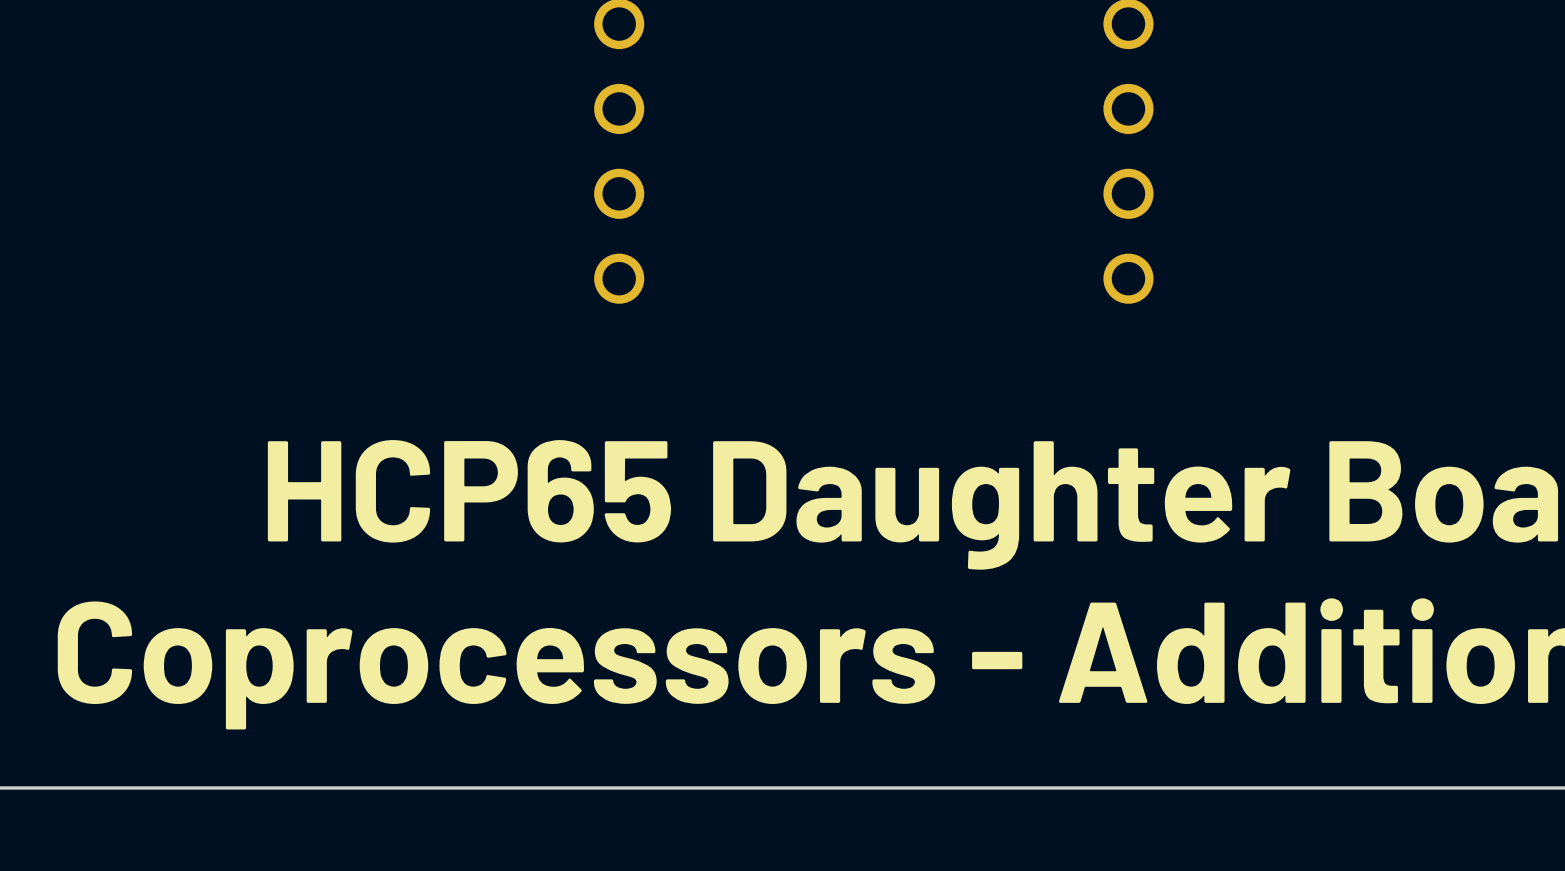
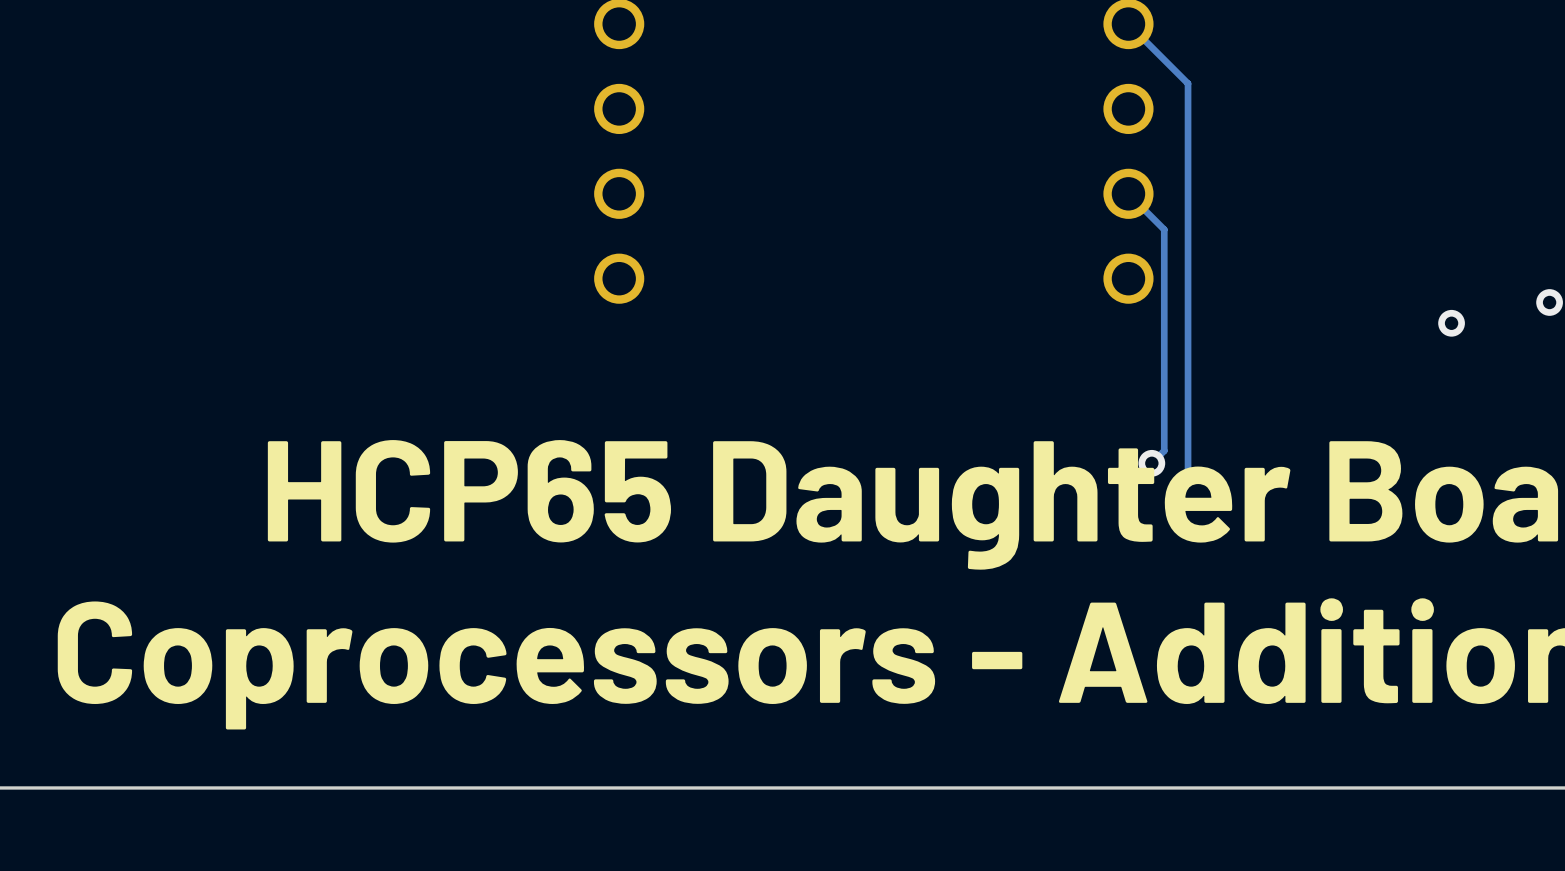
track: none -> (1128, 24) (1188, 83) (1188, 479)
track: none -> (1128, 193) (1164, 229) (1164, 450) (1151, 463)
via: none -> (1549, 302)
via: none -> (1451, 323)
via: none -> (1151, 463)

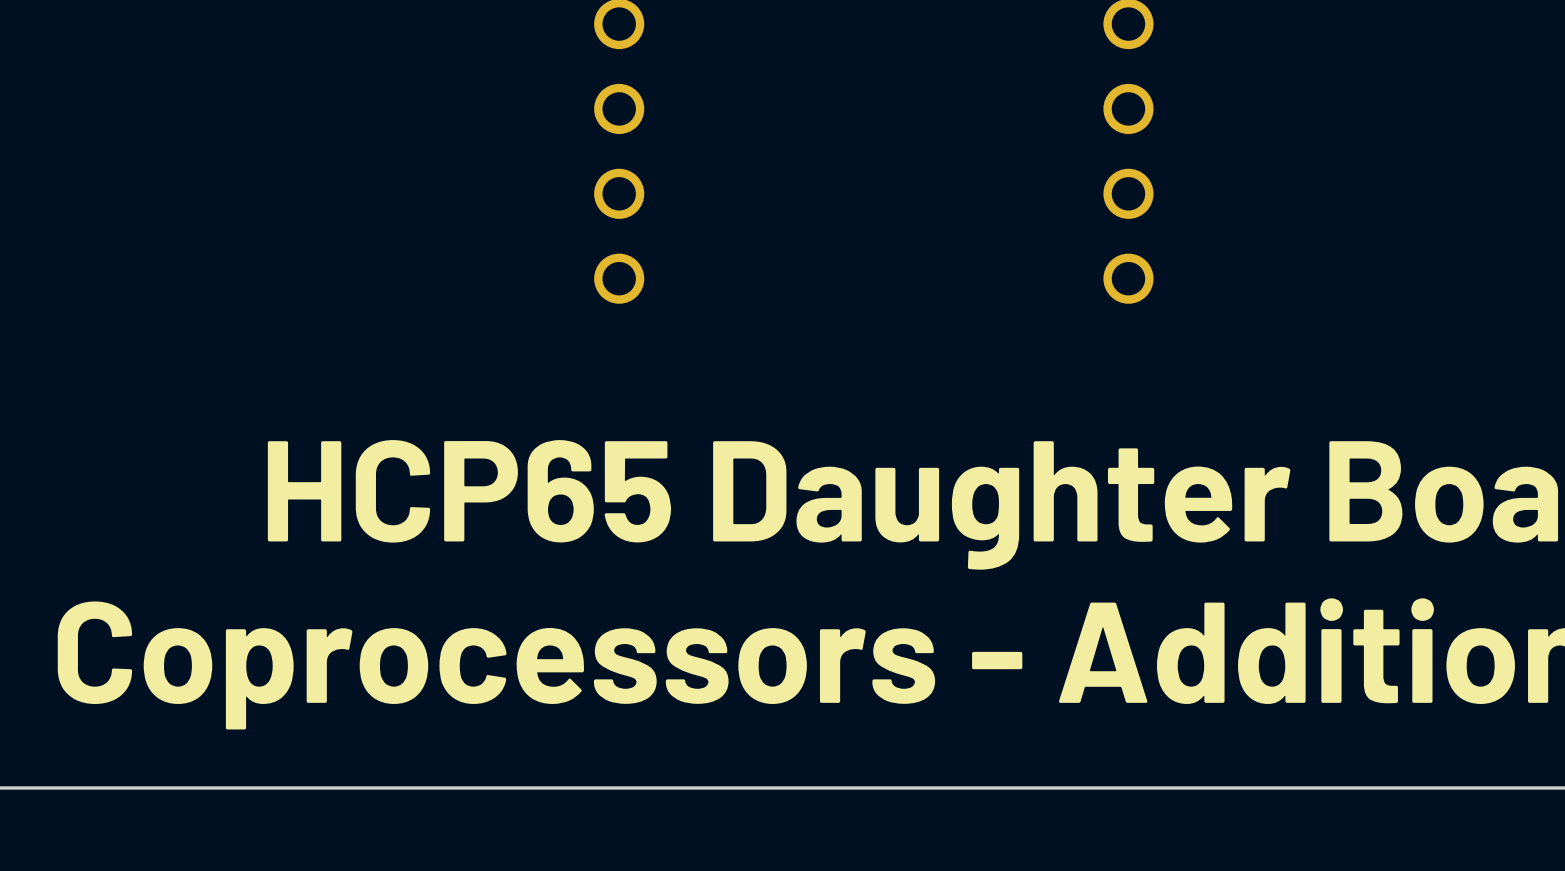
track: (1128, 24) (1188, 83) (1188, 479) -> none
track: (1128, 193) (1164, 229) (1164, 450) (1151, 463) -> none
via: (1549, 302) -> none
via: (1451, 323) -> none
via: (1151, 463) -> none

